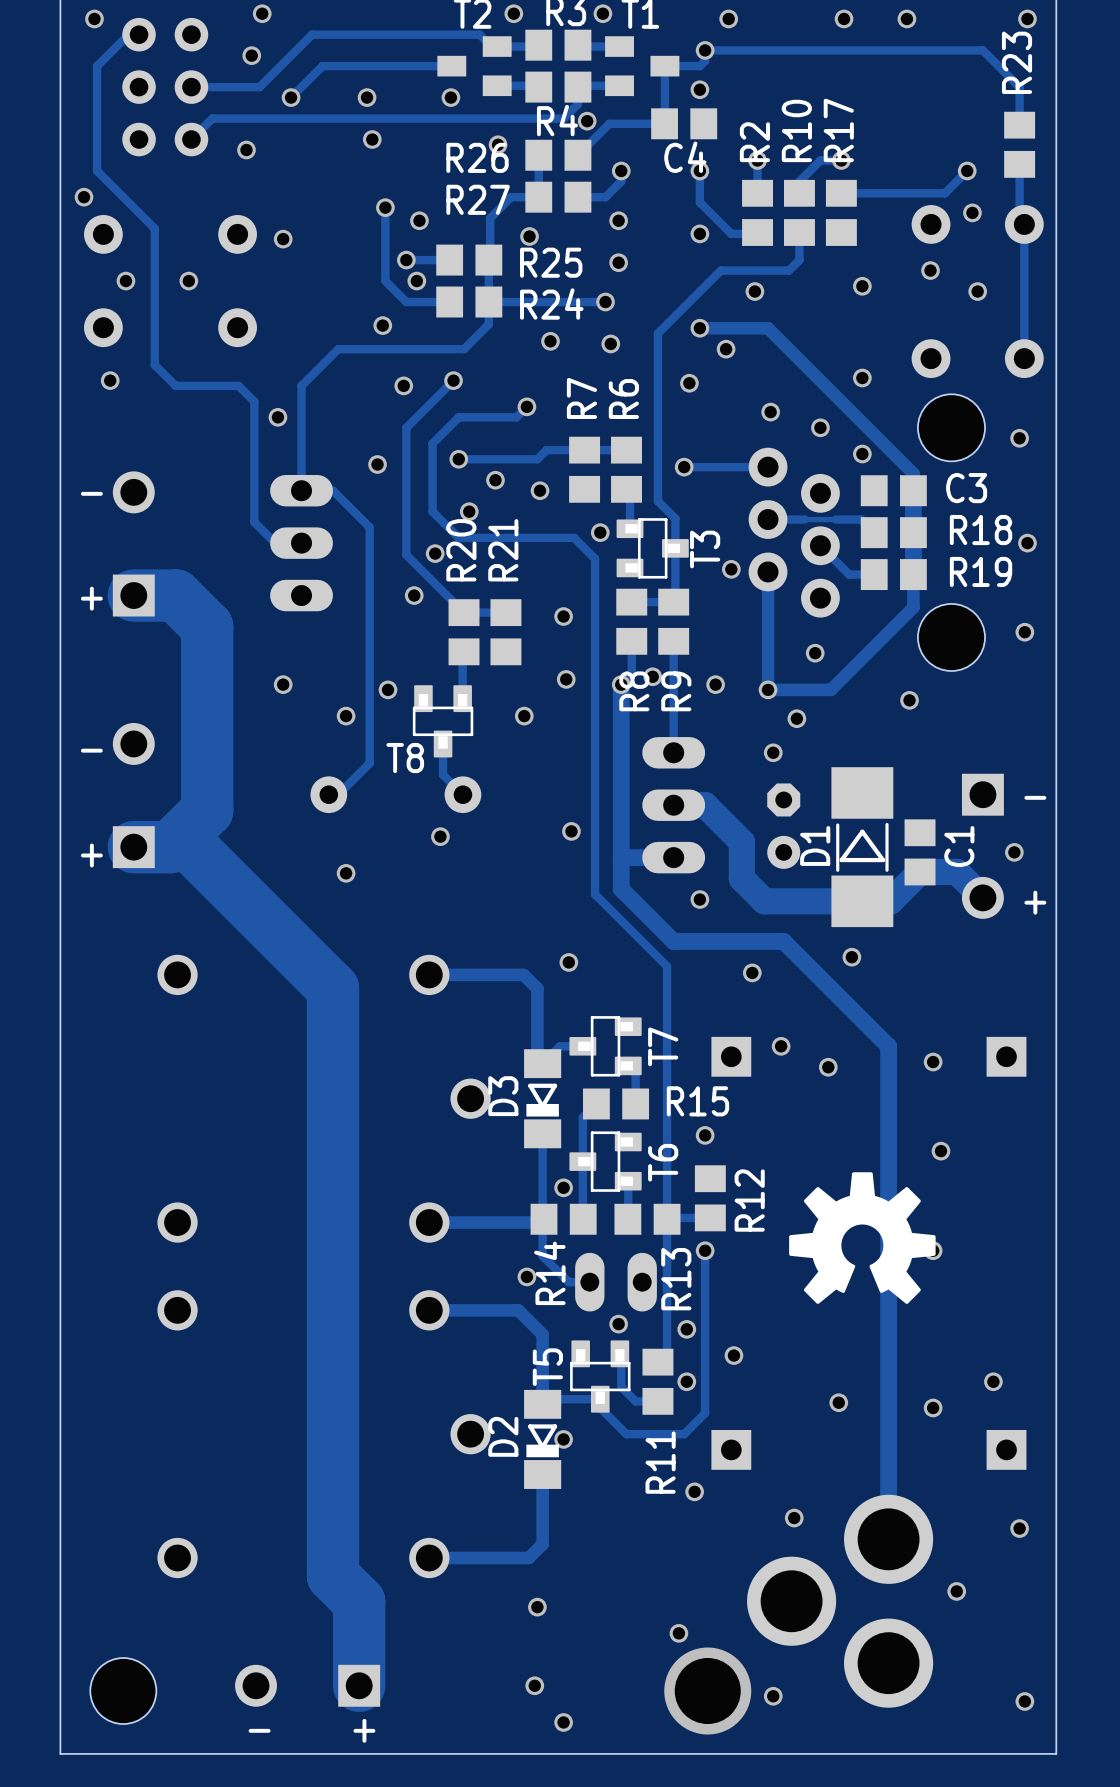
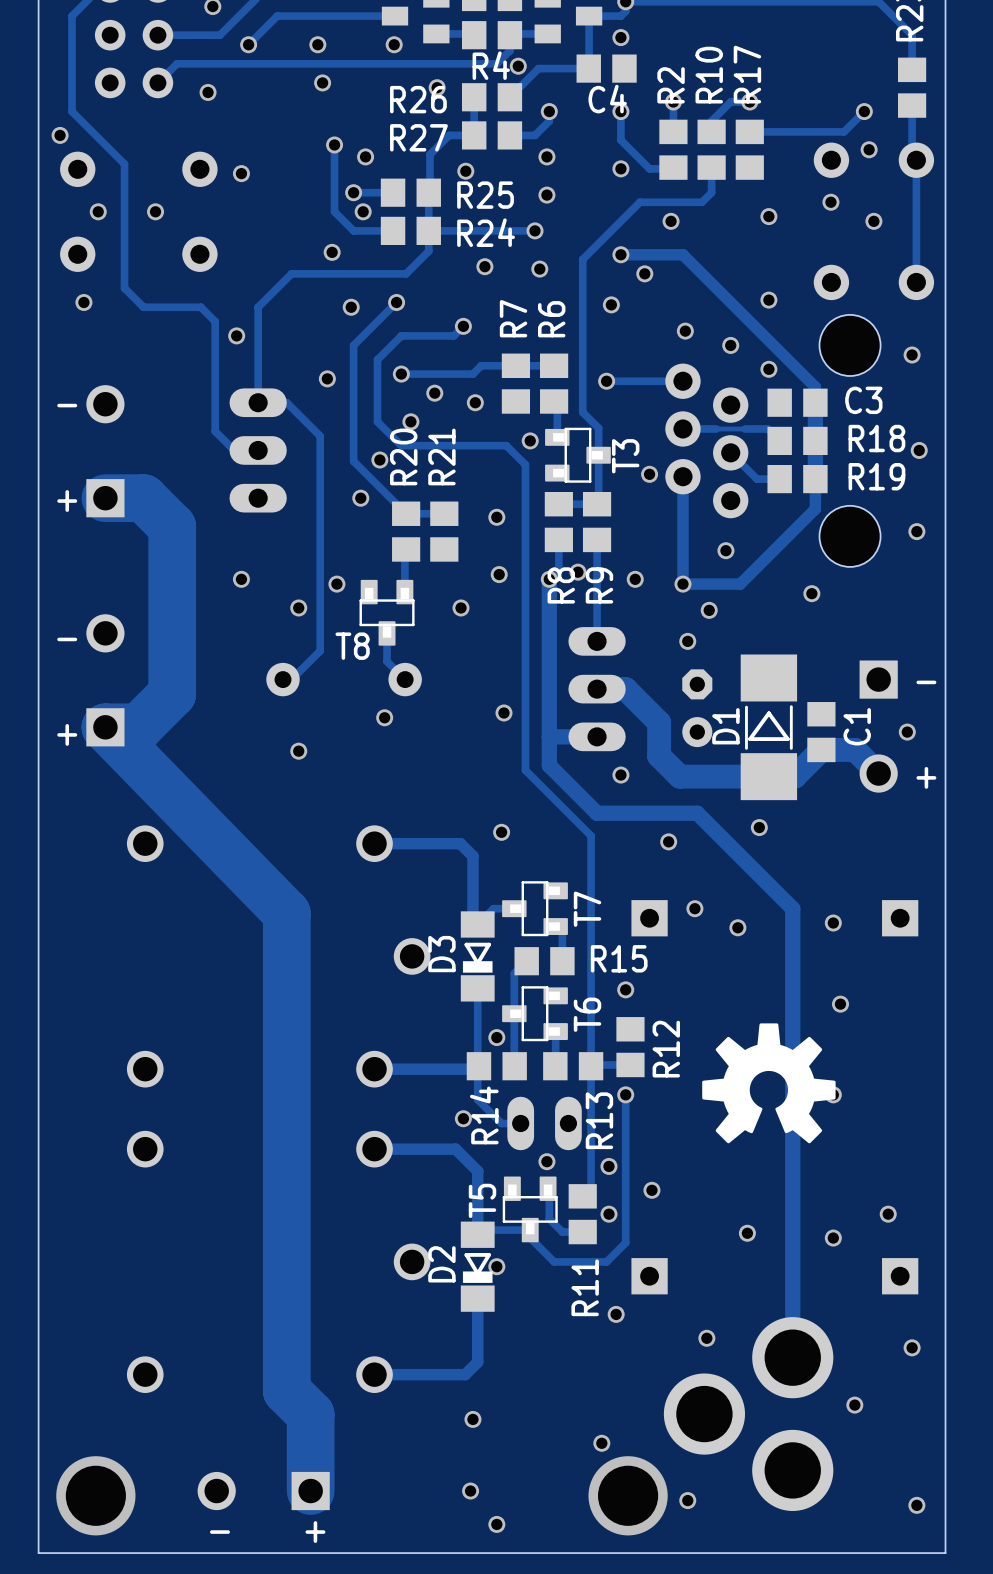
track: (180, 836) (332, 988) (332, 1051) -> (105, 727) (286, 913)
hole: (123, 1691) -> none
via: none -> (95, 1495)

